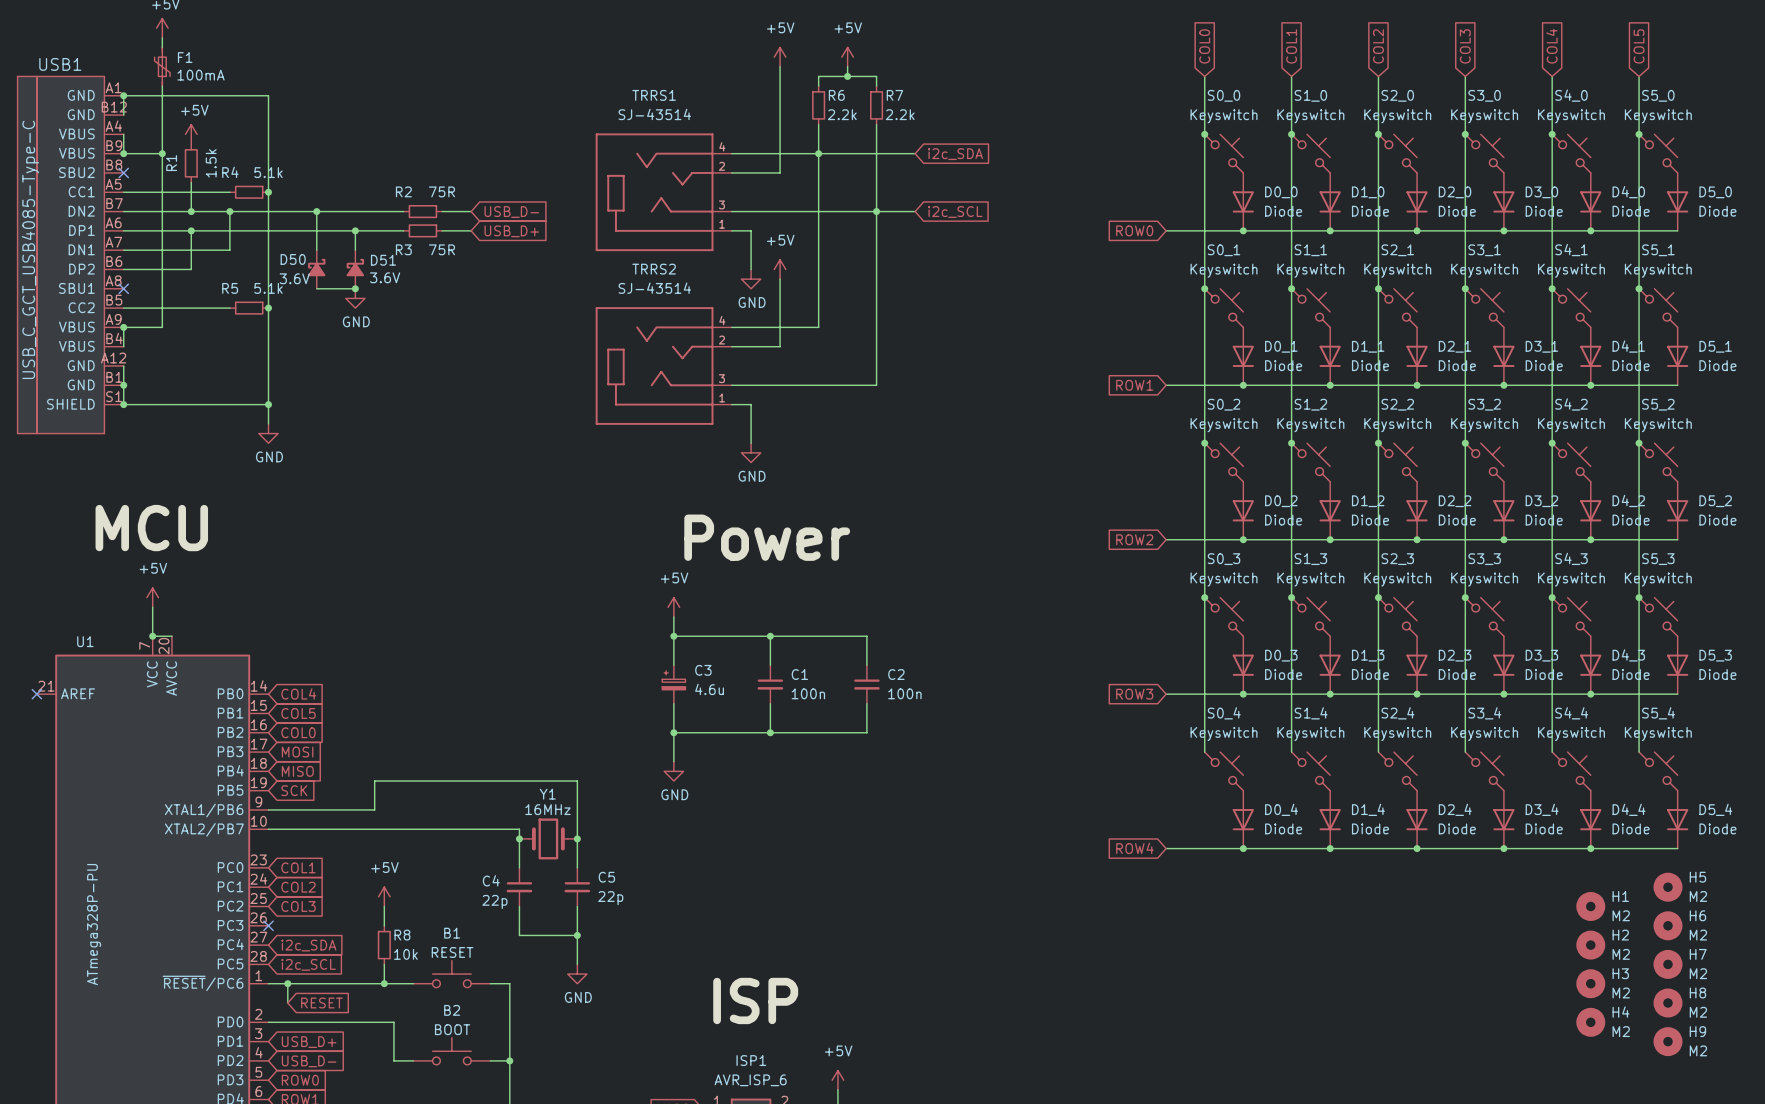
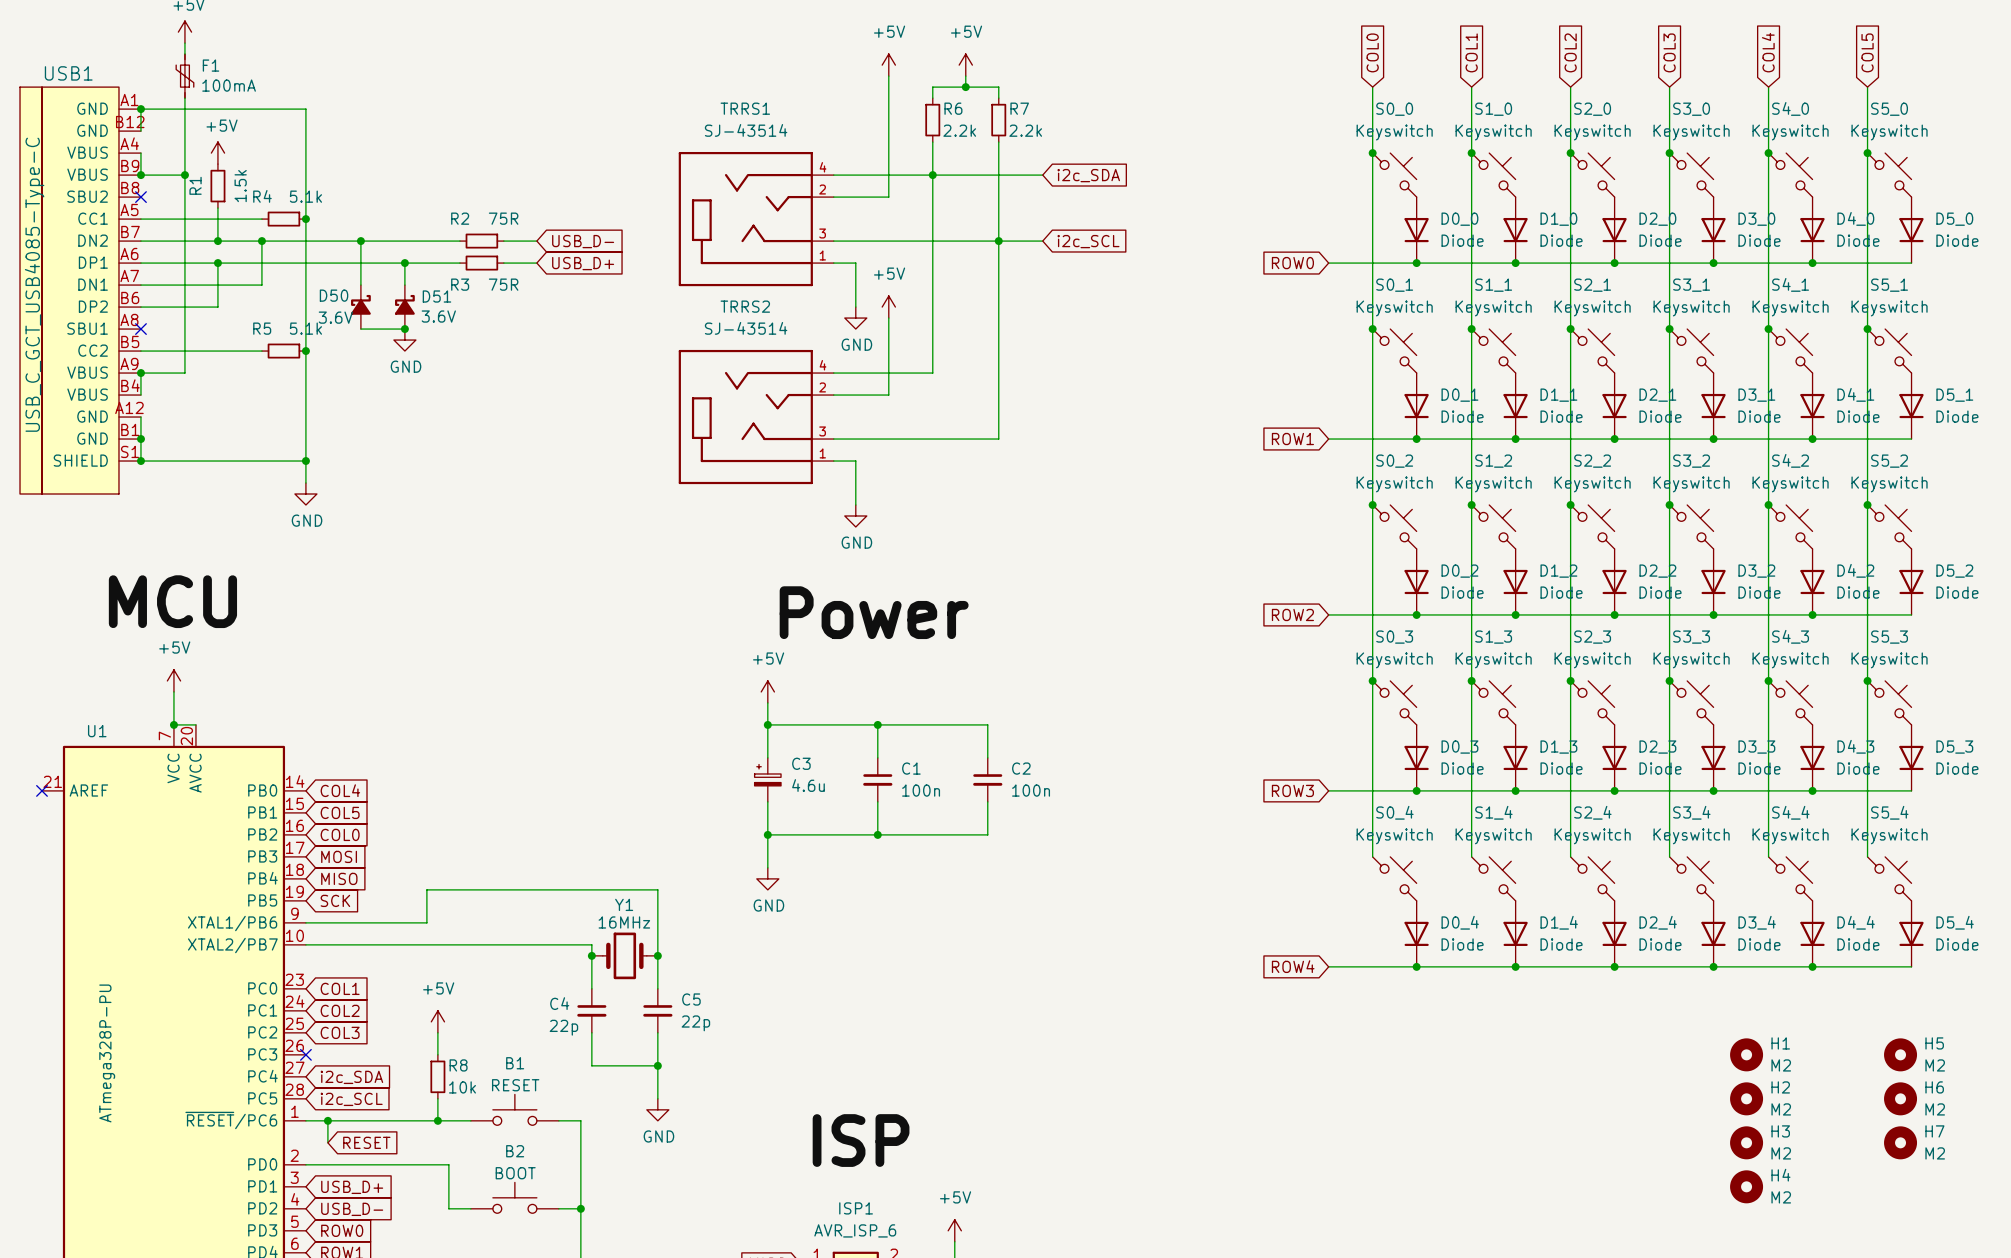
H5: M2 (1668, 887) -> none
H1 position: (1590, 906) -> (1746, 1054)
H6 name: H6 (1697, 915) -> H5 (1934, 1043)
H2 position: (1590, 945) -> (1746, 1098)
H7 name: H7 (1698, 954) -> H6 (1934, 1087)
H3 position: (1590, 983) -> (1746, 1142)
H8 name: H8 (1697, 992) -> H7 (1934, 1131)
H4 position: (1590, 1022) -> (1746, 1186)
H9: M2 (1668, 1041) -> none

